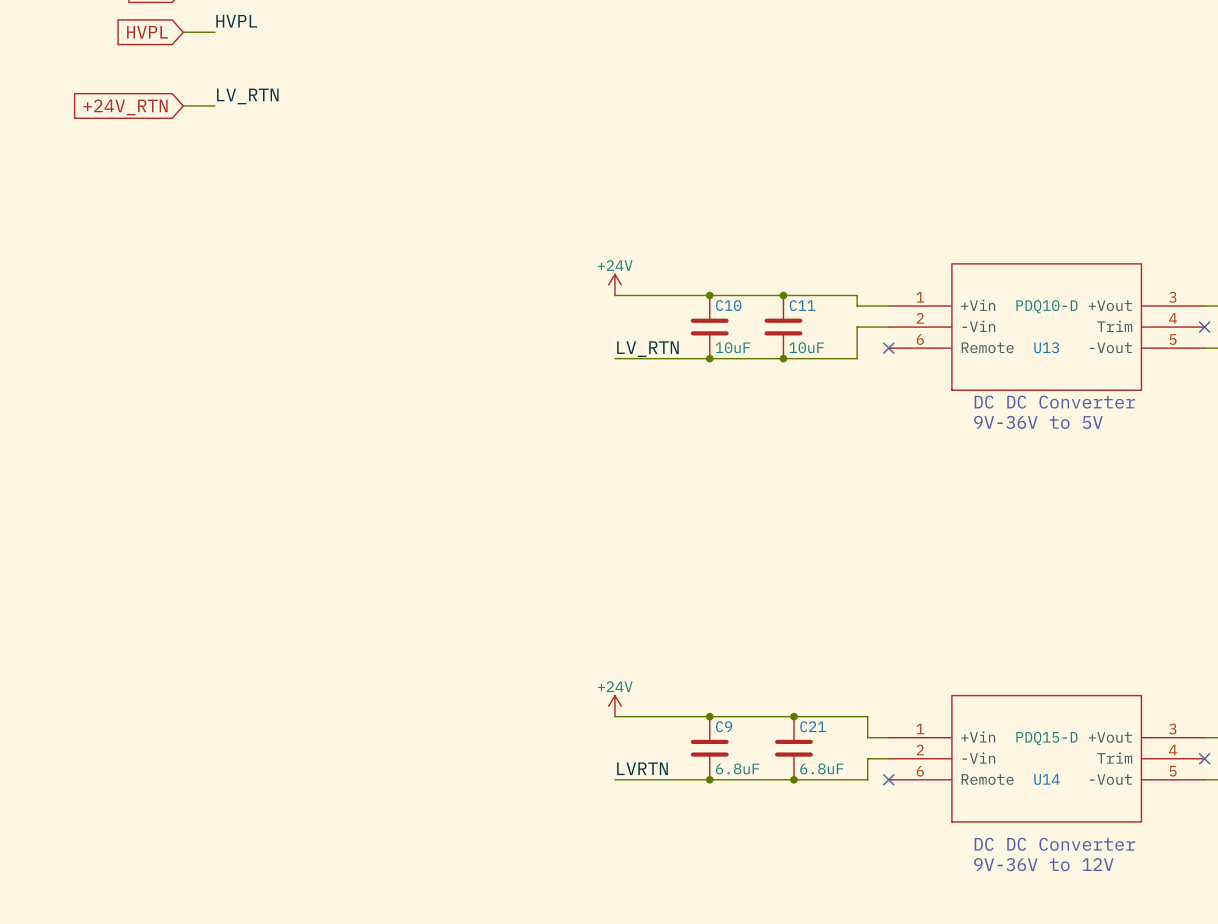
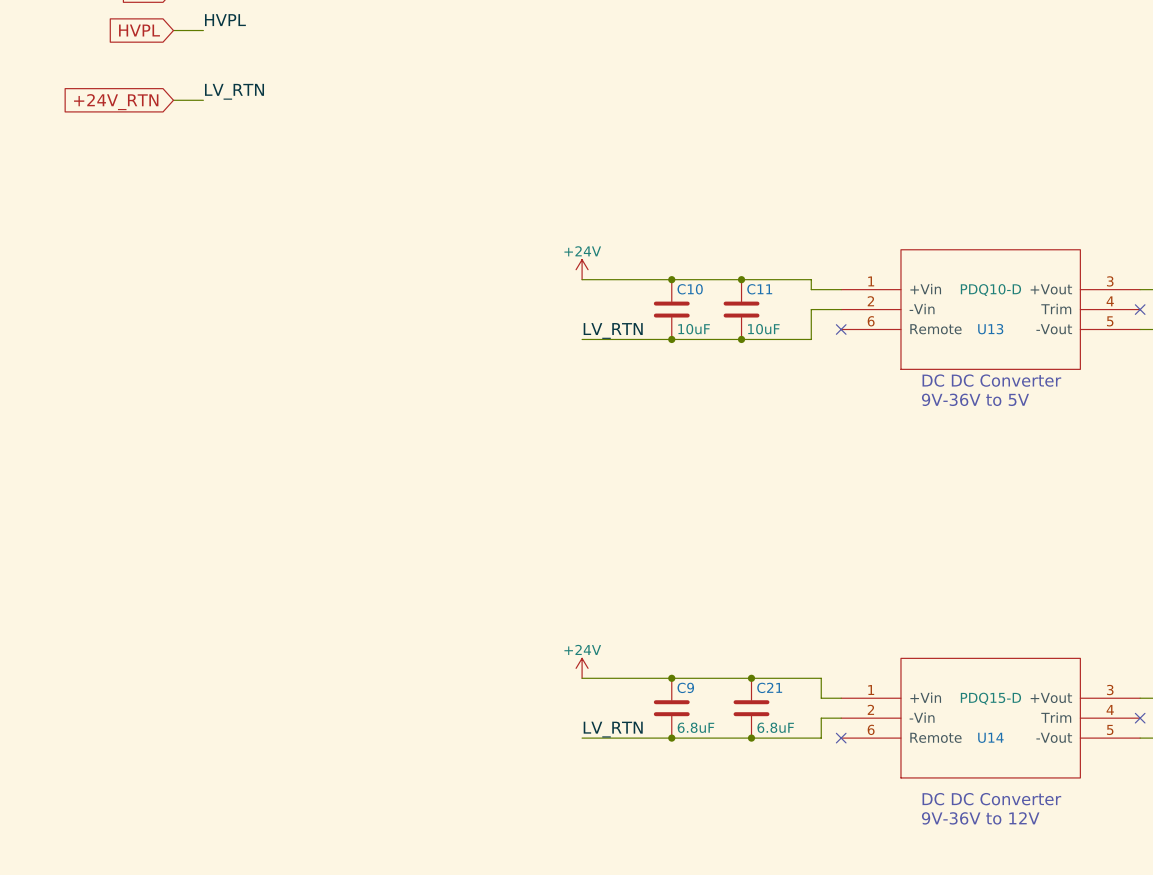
label: LVRTN (642, 768) -> LV_RTN (613, 729)

